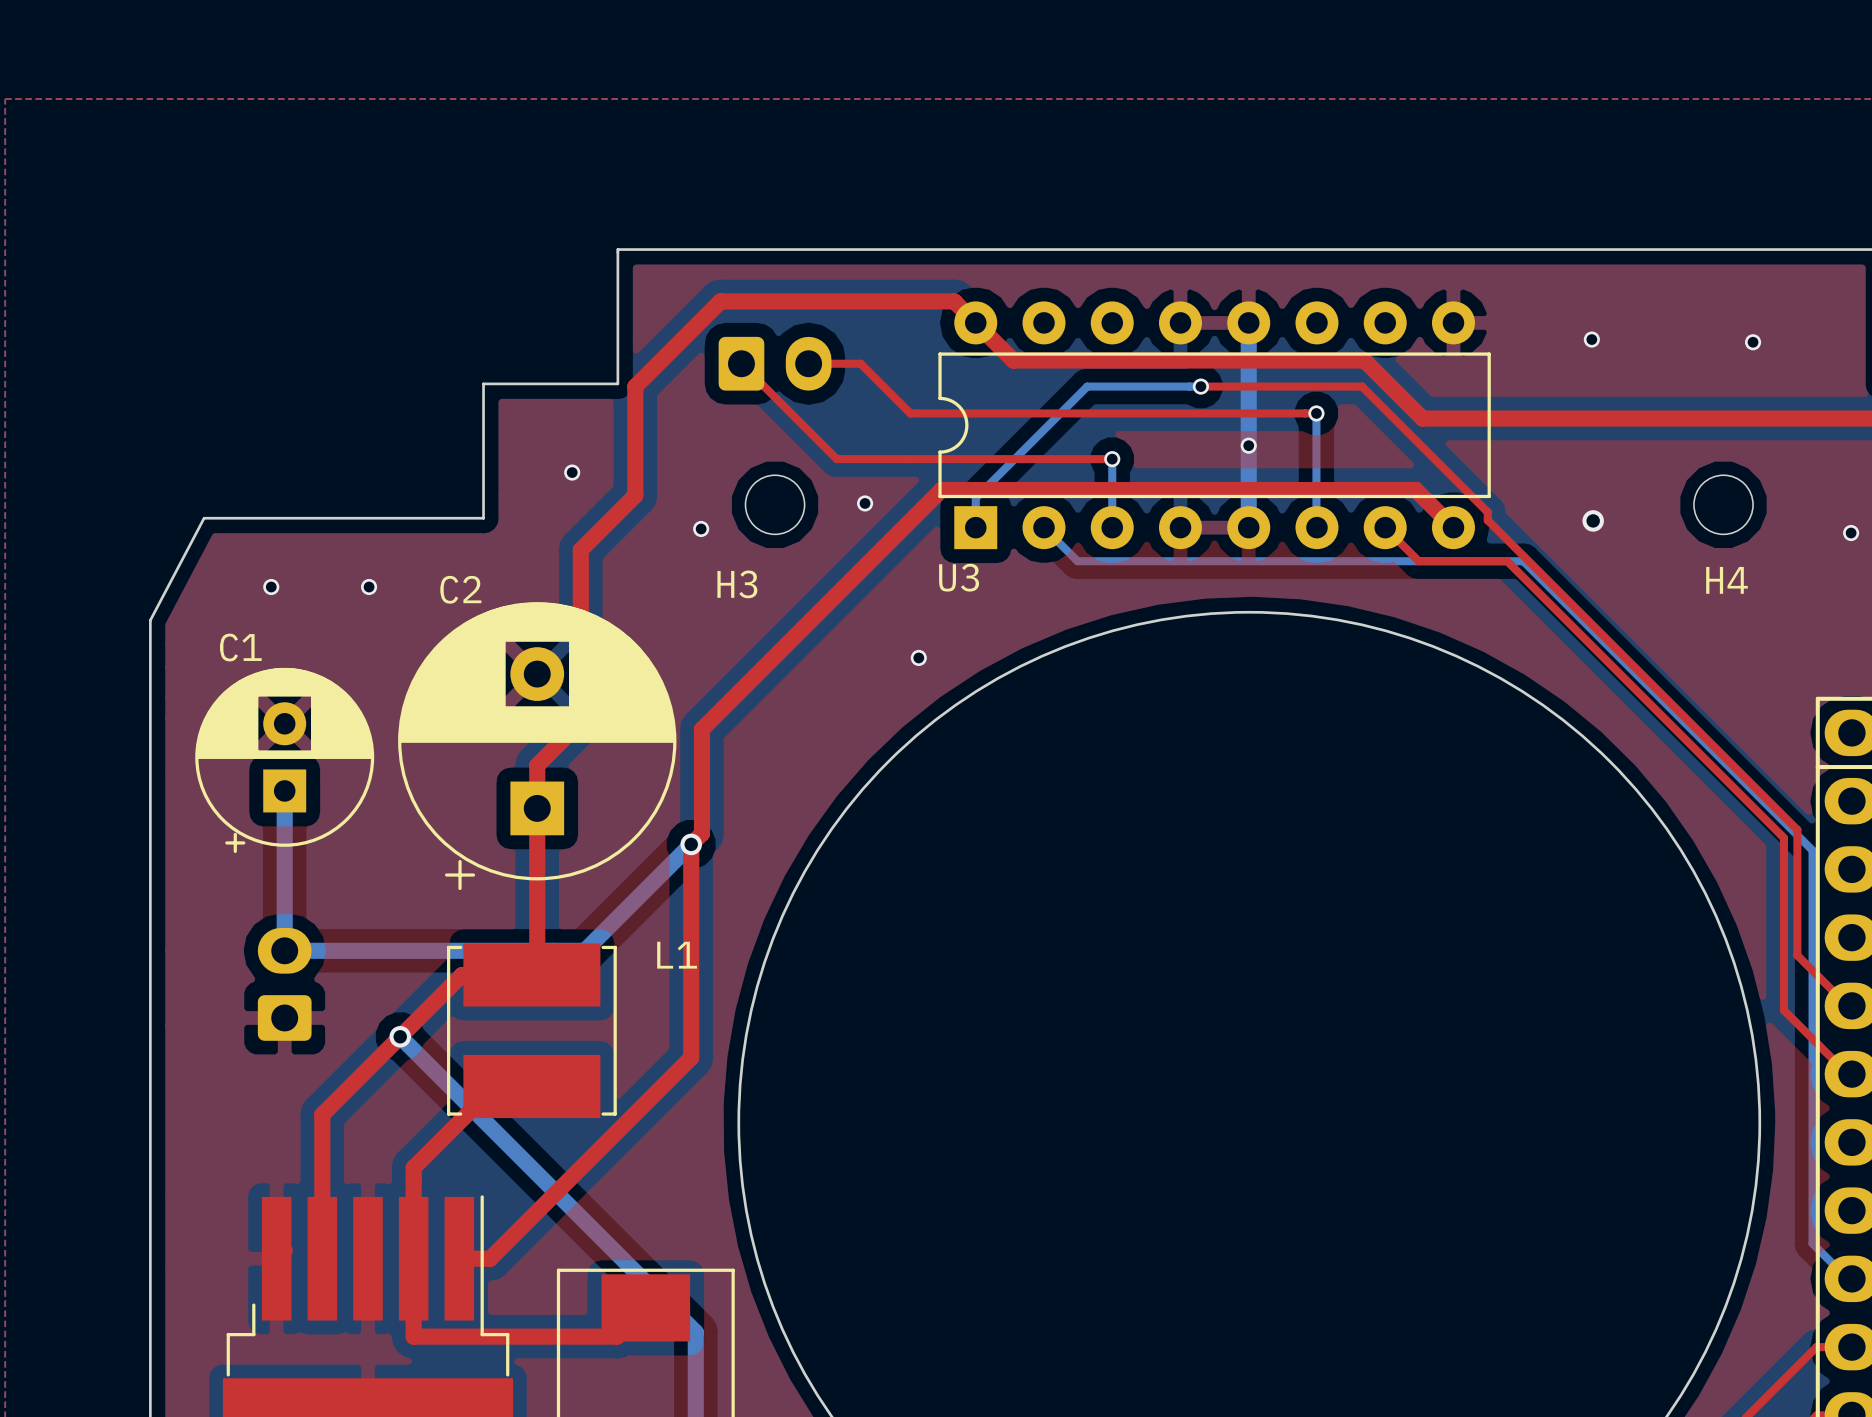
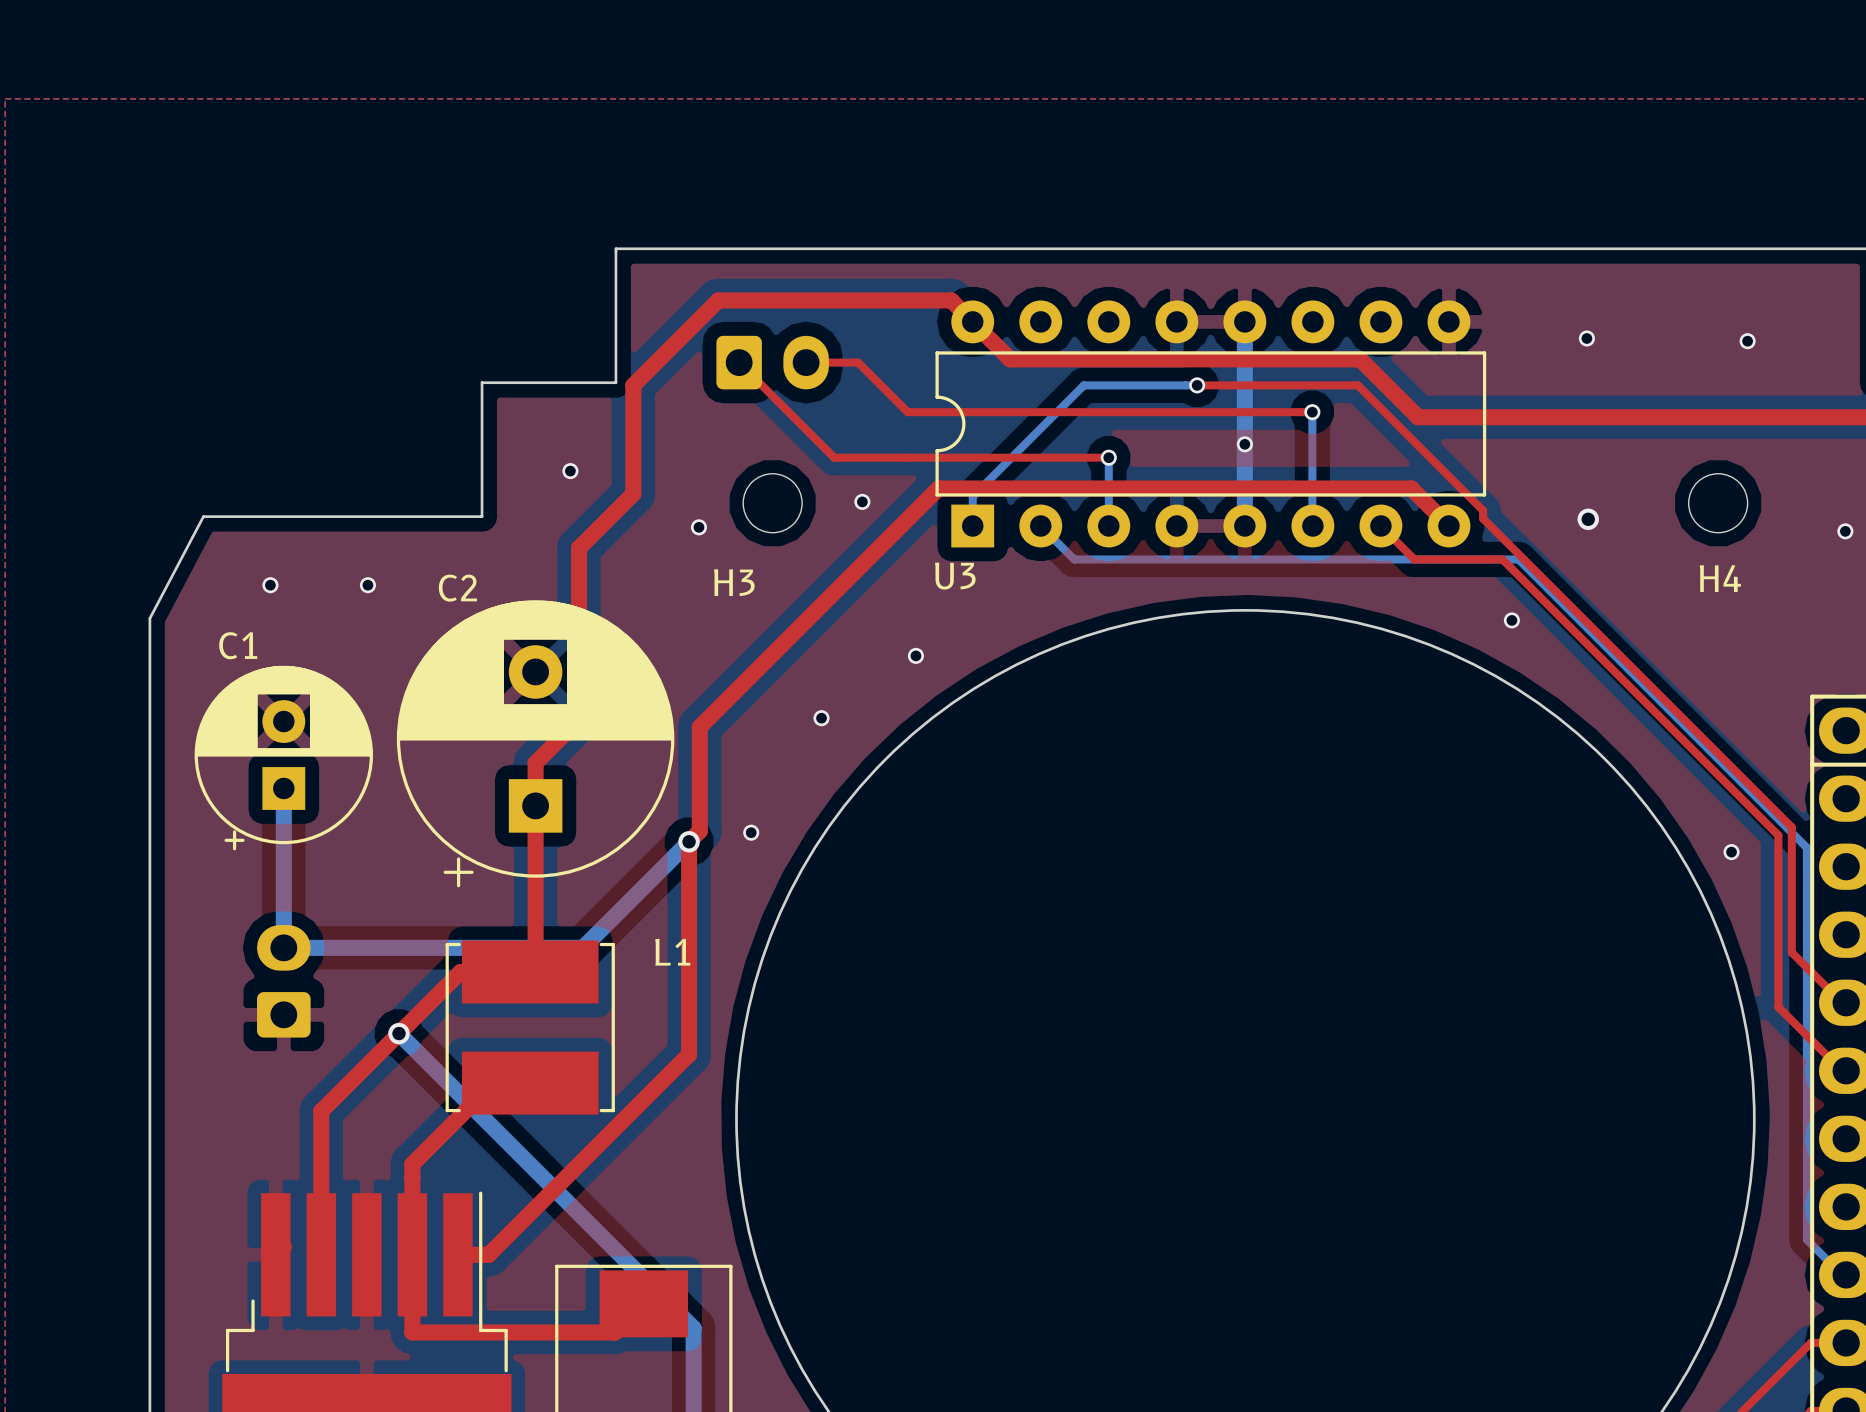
via: none -> (1511, 620)
via: none -> (821, 718)
via: none -> (751, 832)
via: none -> (1731, 852)

